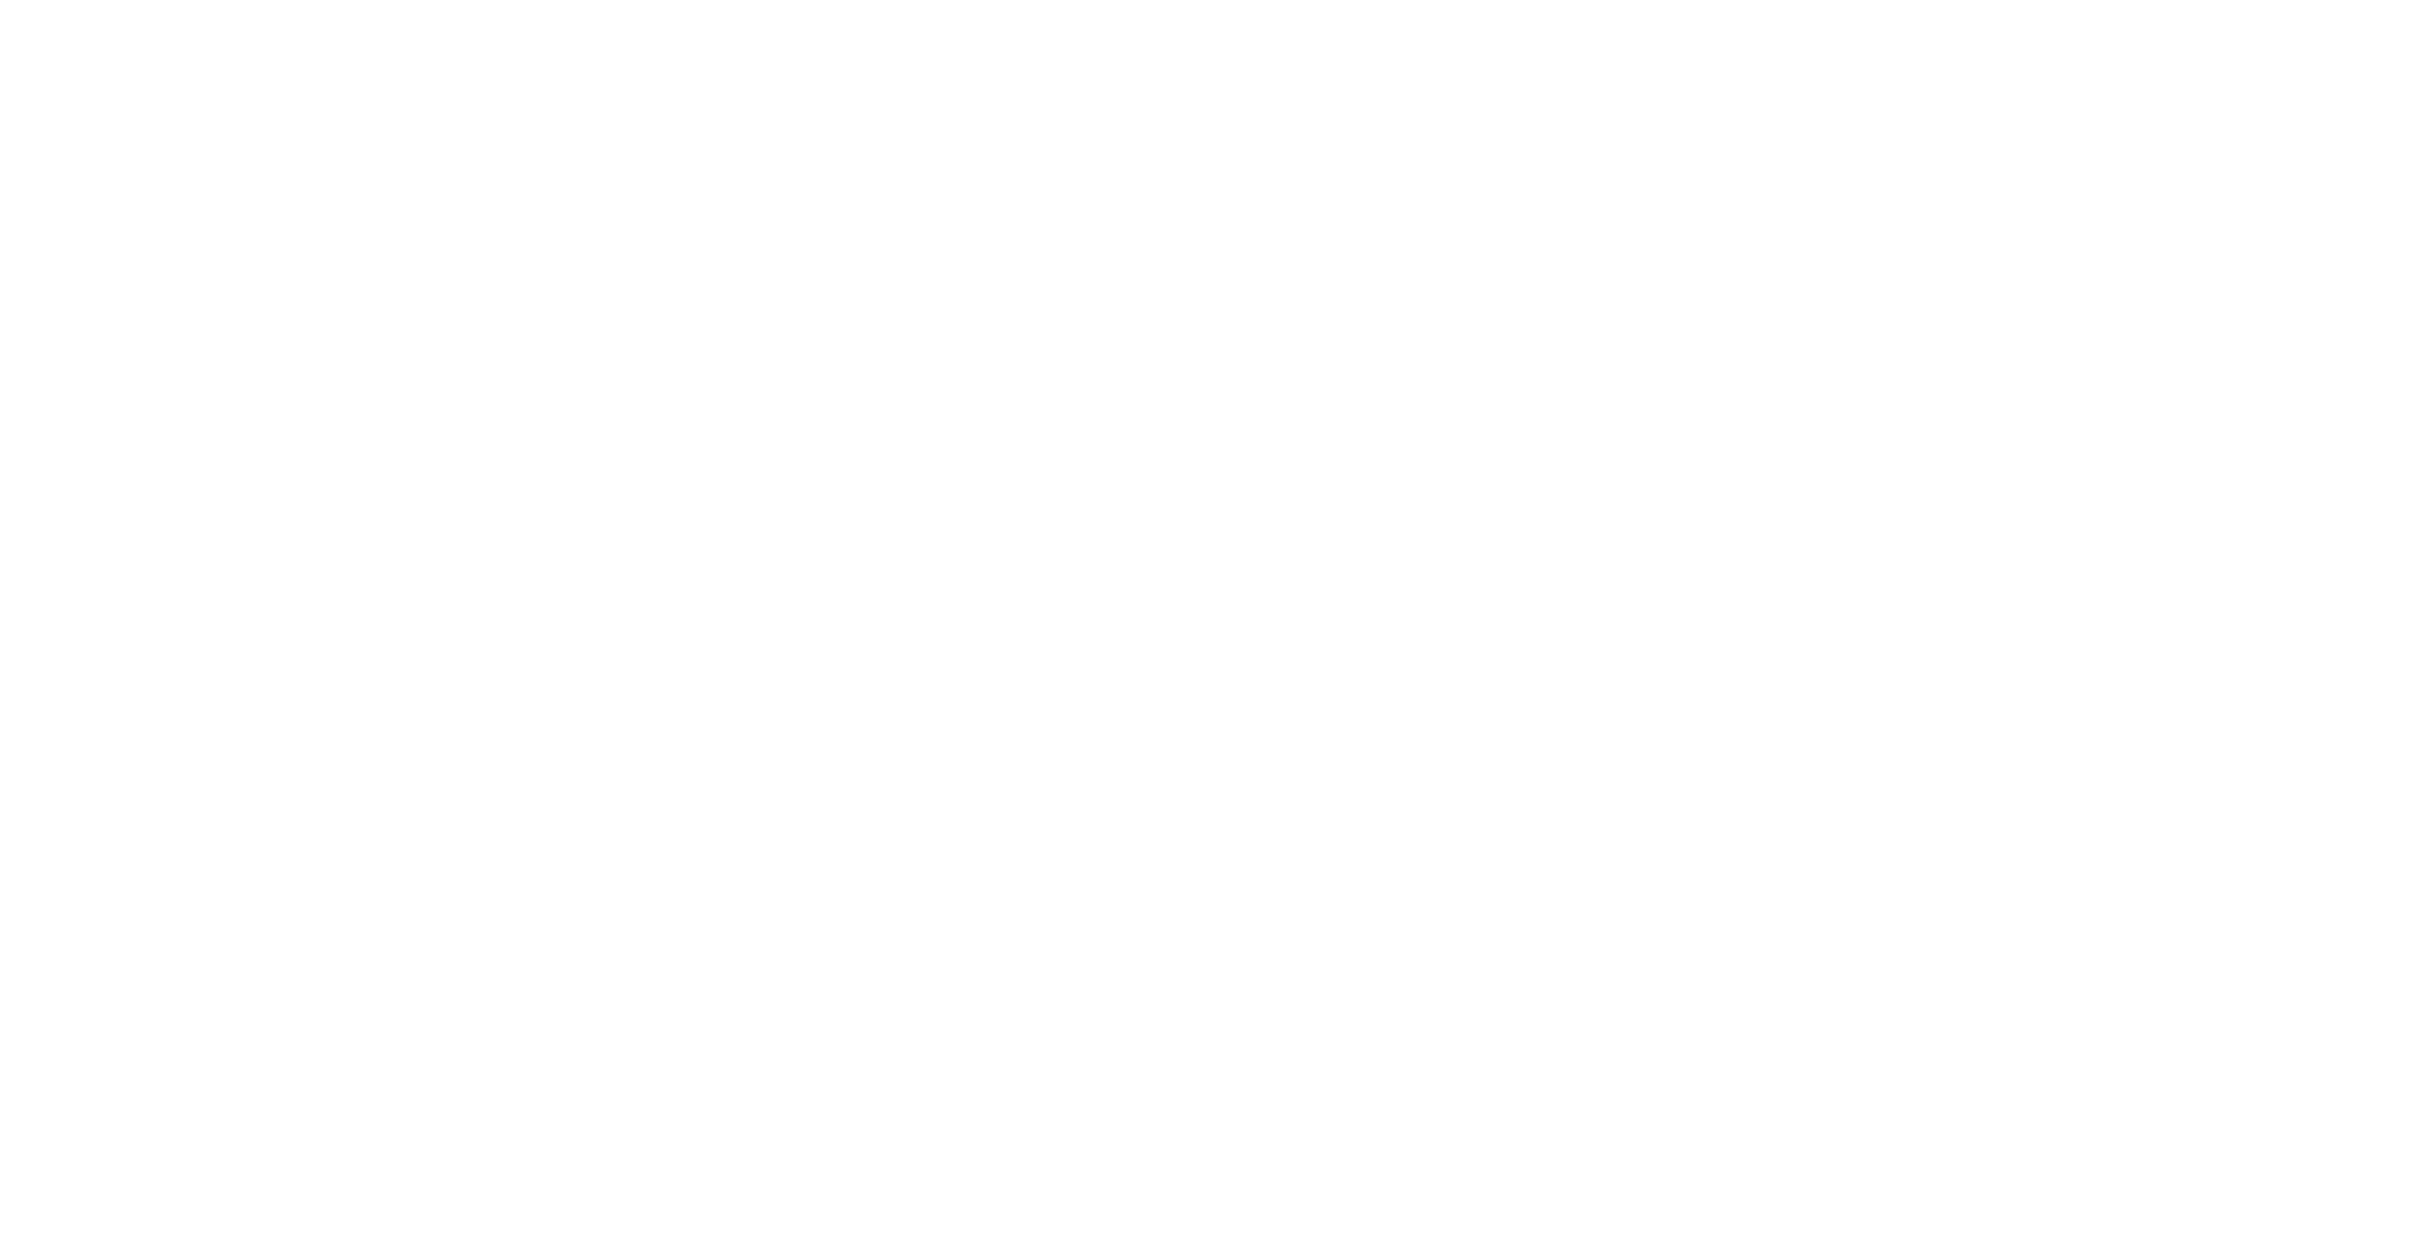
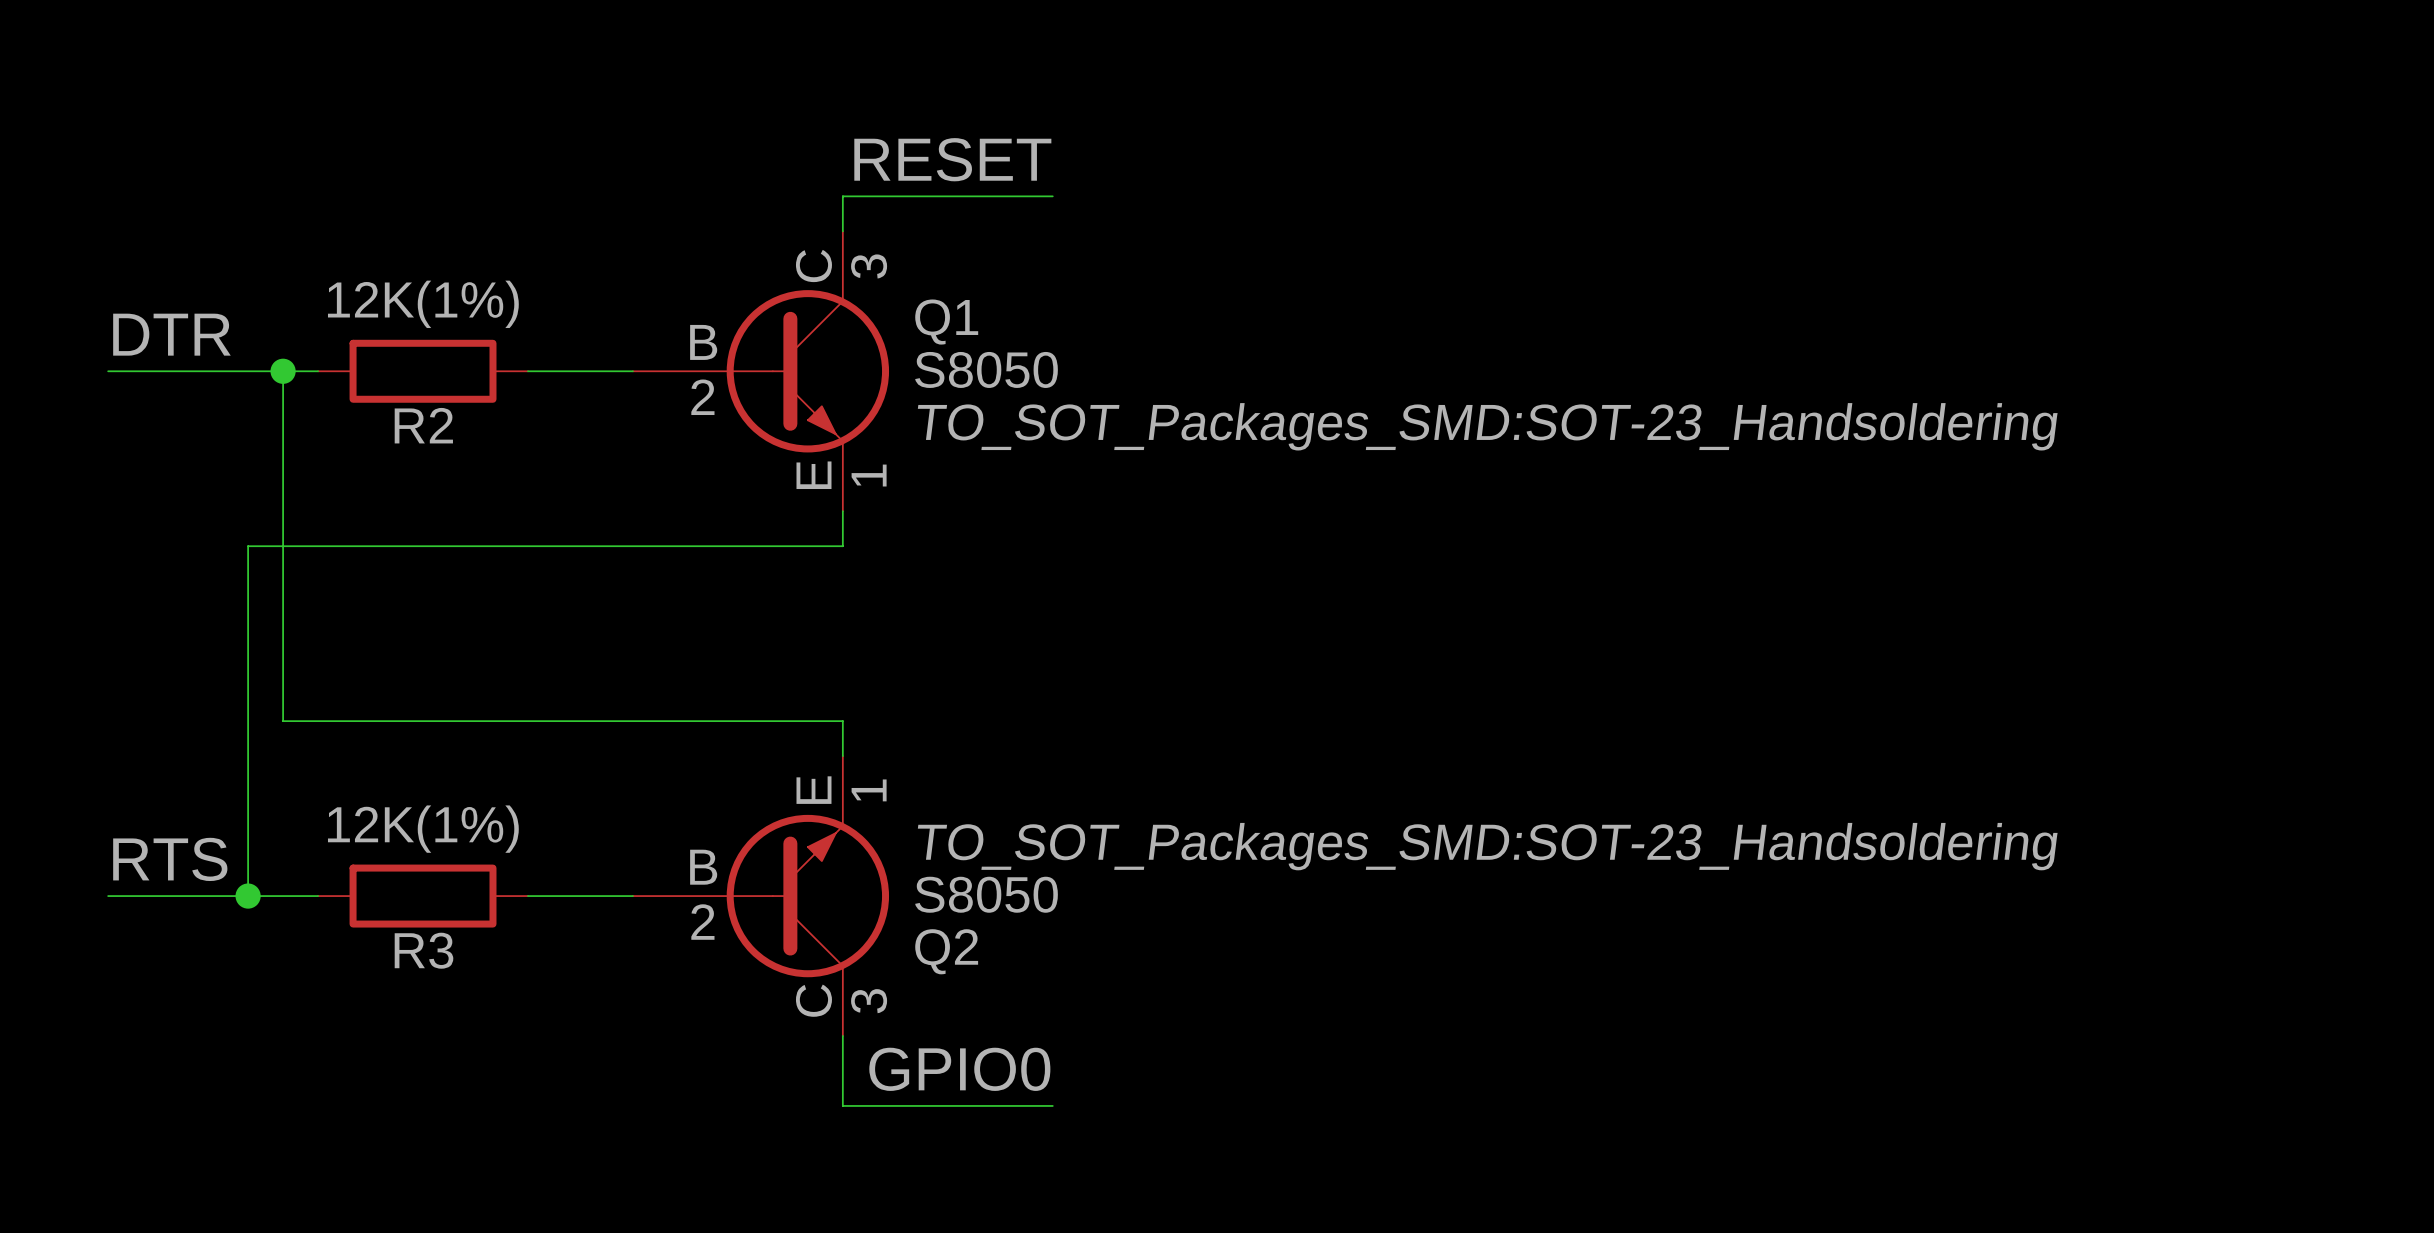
label: none -> RESET (952, 159)
wire: none -> (1052, 196) (842, 196) (842, 231)
label: none -> DTR (171, 334)
wire: none -> (108, 371) (318, 371)
wire: none -> (283, 371) (283, 721) (842, 721) (842, 756)
junction: none -> (283, 371)
R2: none -> 12K(1%) (423, 371)
wire: none -> (527, 371) (632, 371)
Q1: none -> S8050 (760, 371)
wire: none -> (842, 511) (842, 546) (248, 546) (248, 896)
label: none -> RTS (170, 859)
wire: none -> (108, 896) (318, 896)
junction: none -> (248, 896)
R3: none -> 12K(1%) (423, 896)
wire: none -> (527, 896) (632, 896)
Q2: none -> S8050 (760, 896)
wire: none -> (842, 1036) (842, 1105) (1052, 1105)
label: none -> GPIO0 (959, 1069)

